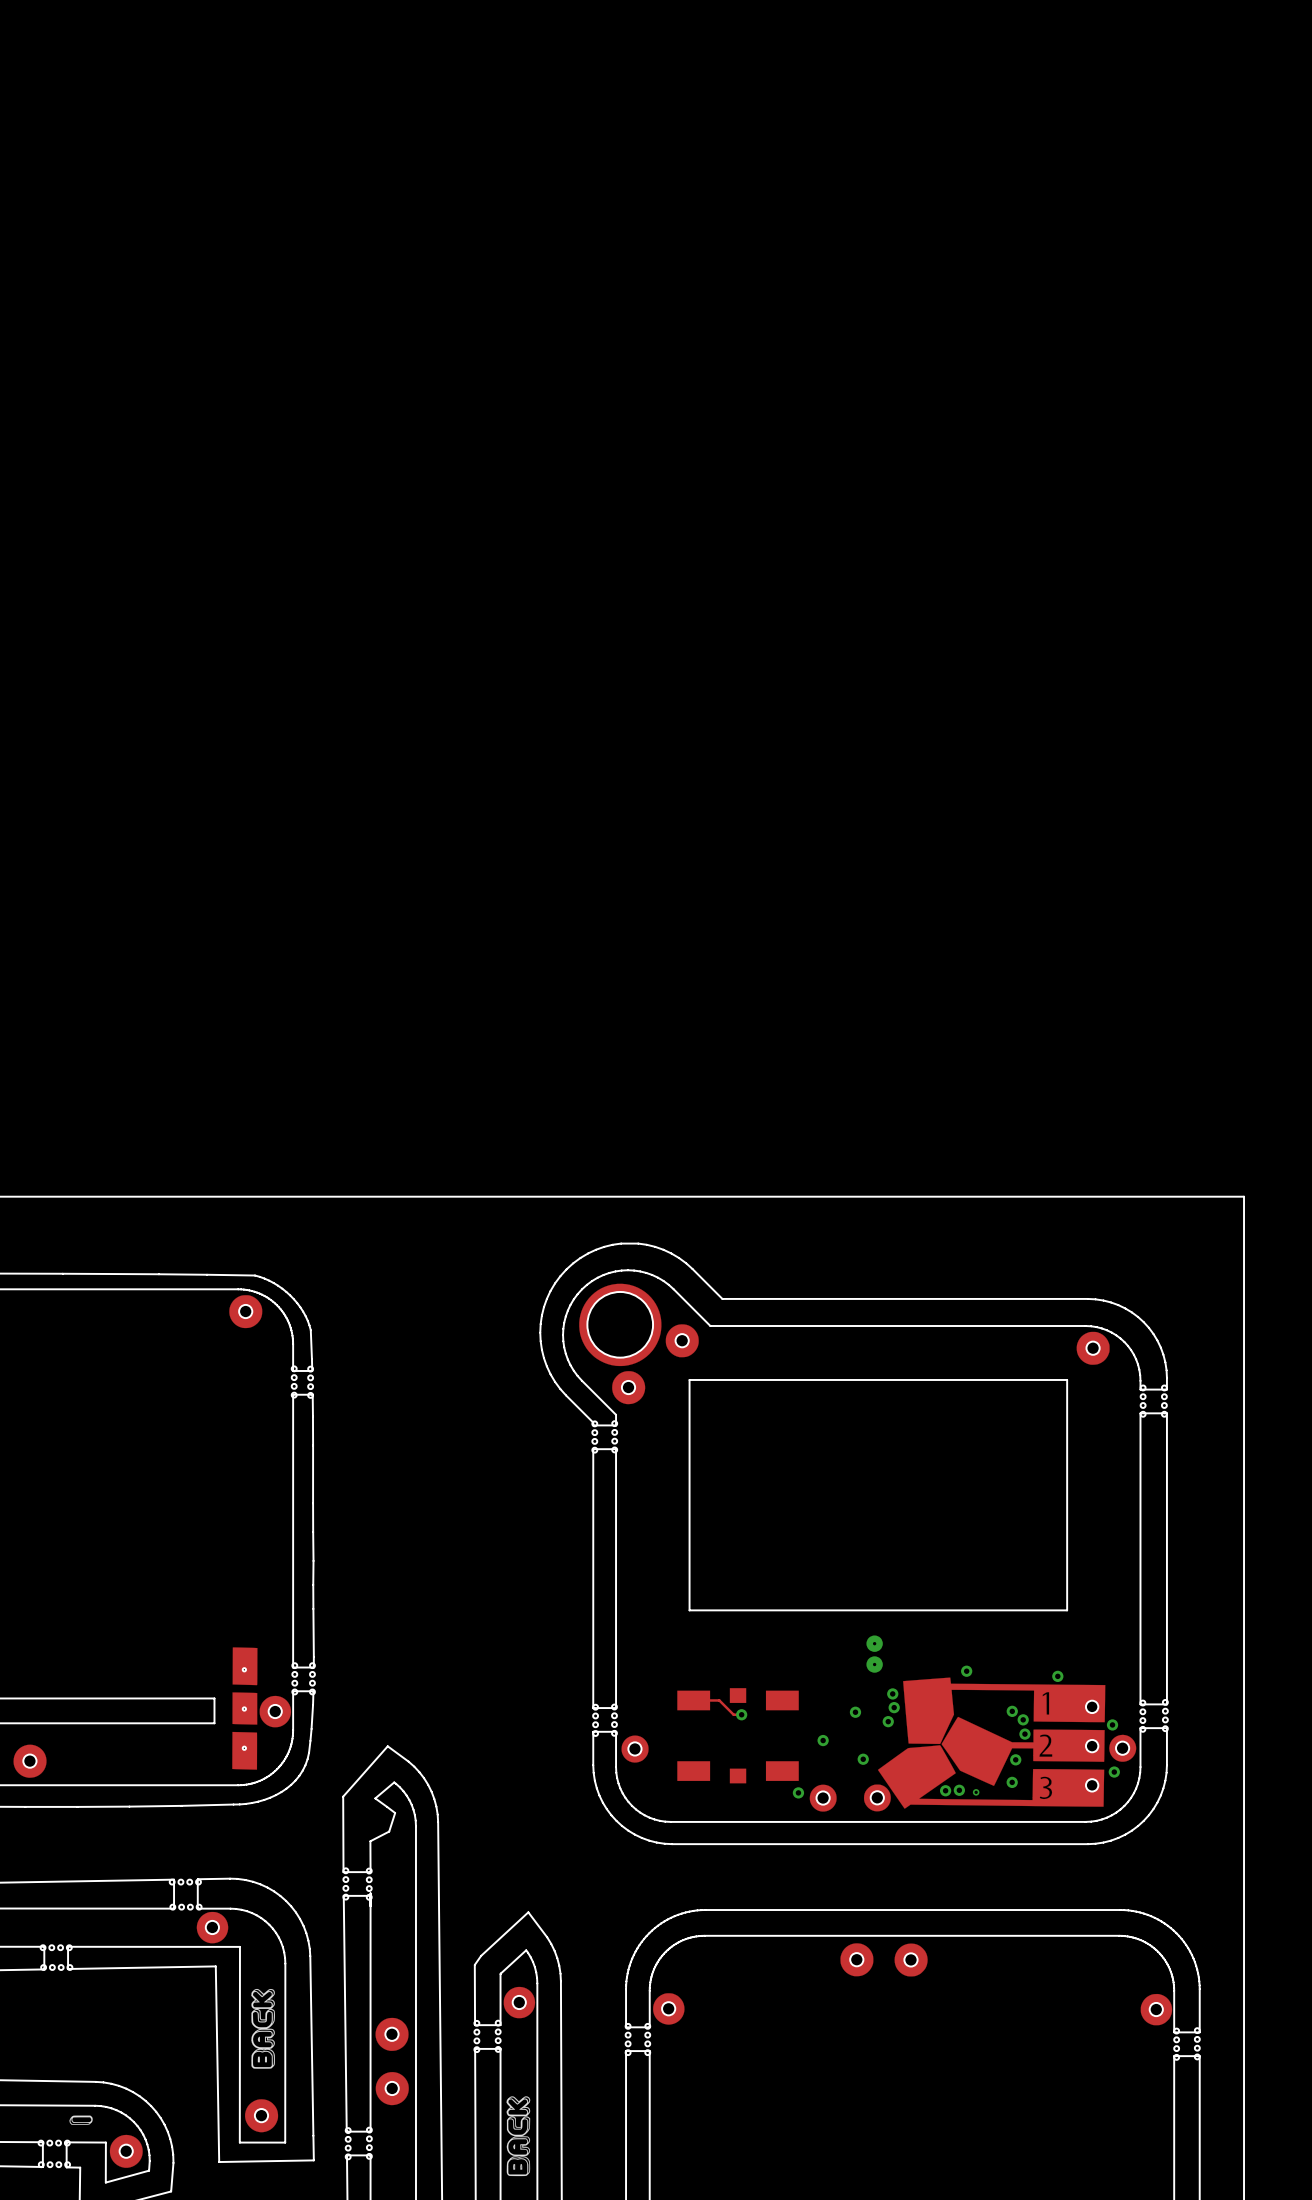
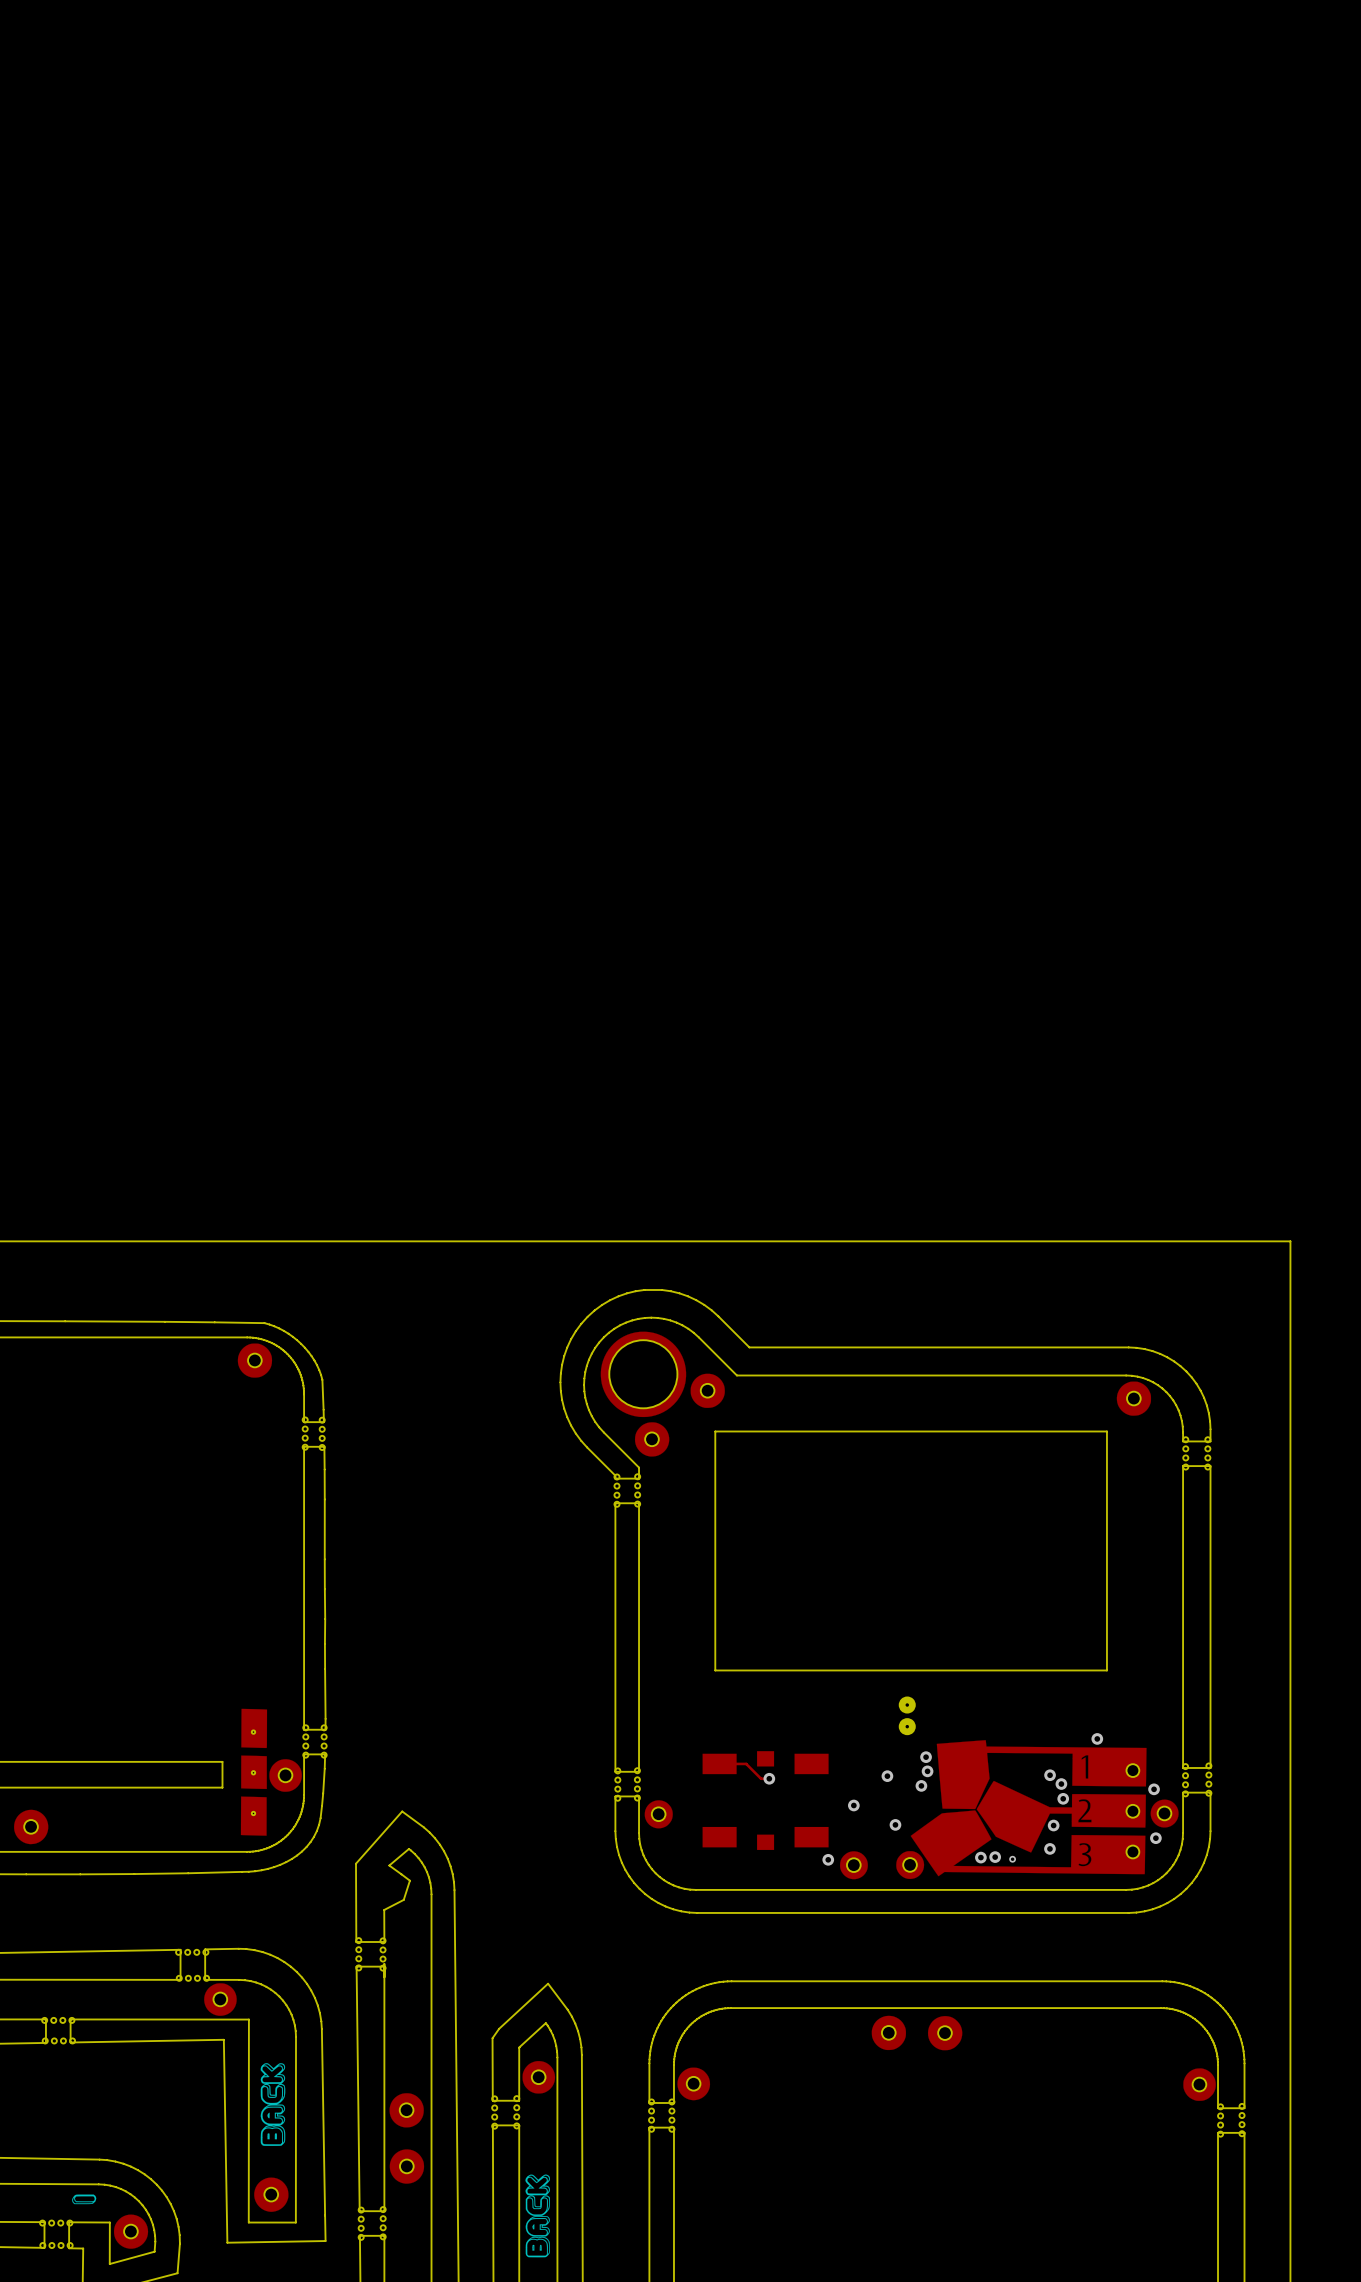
via: (966, 1671) -> none

